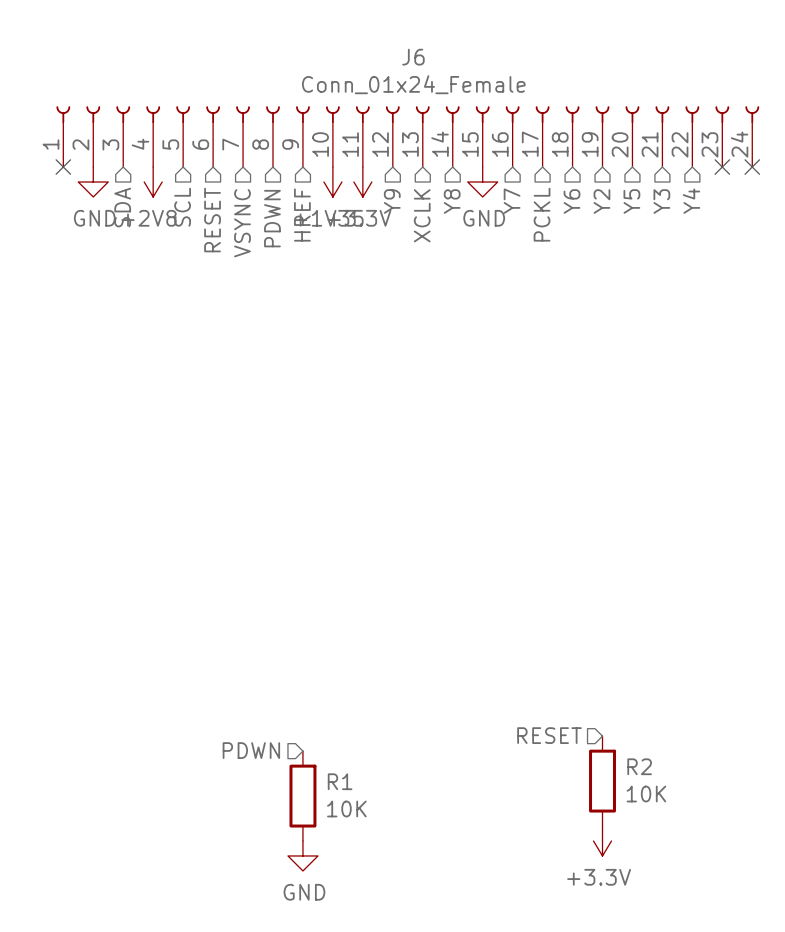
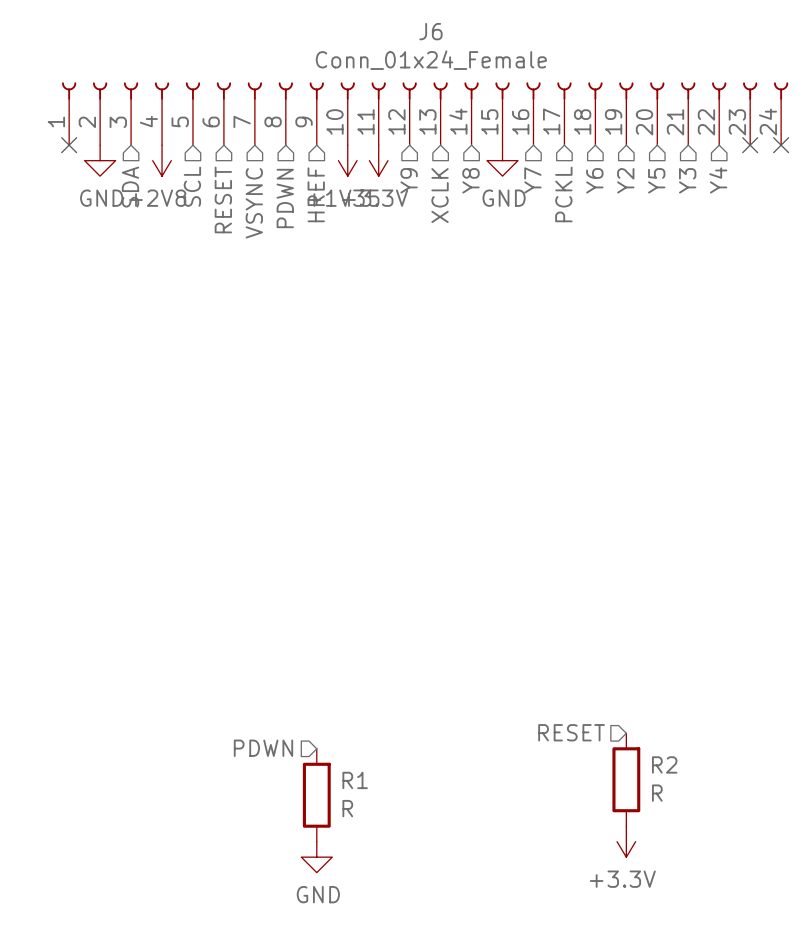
R2 value: 10K (646, 794) -> R (657, 793)
R1 value: 10K (346, 808) -> R (347, 808)

